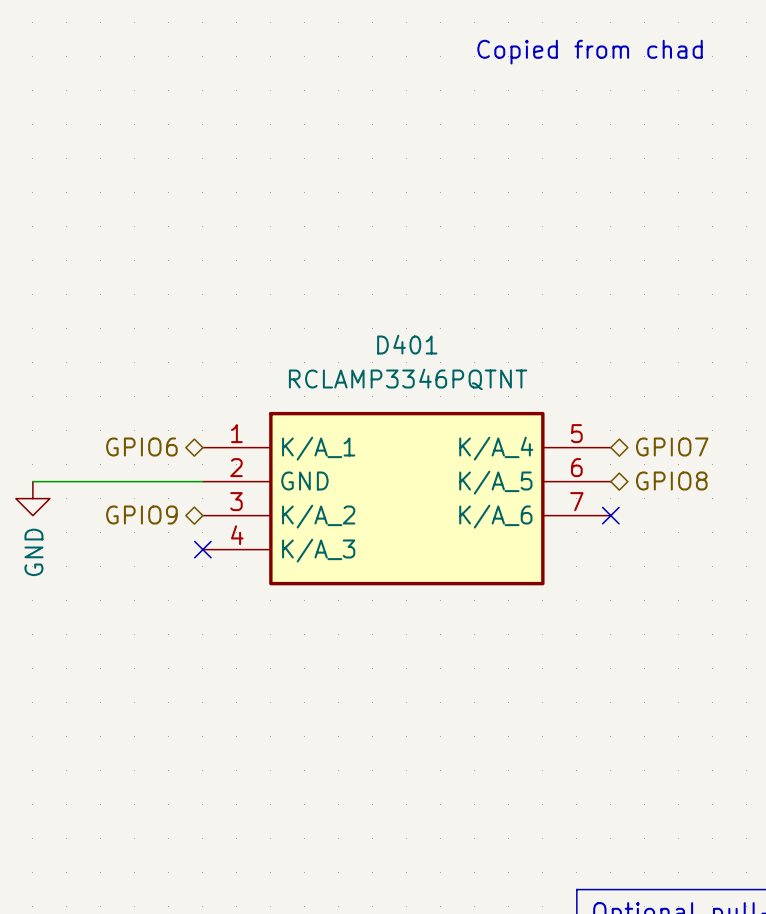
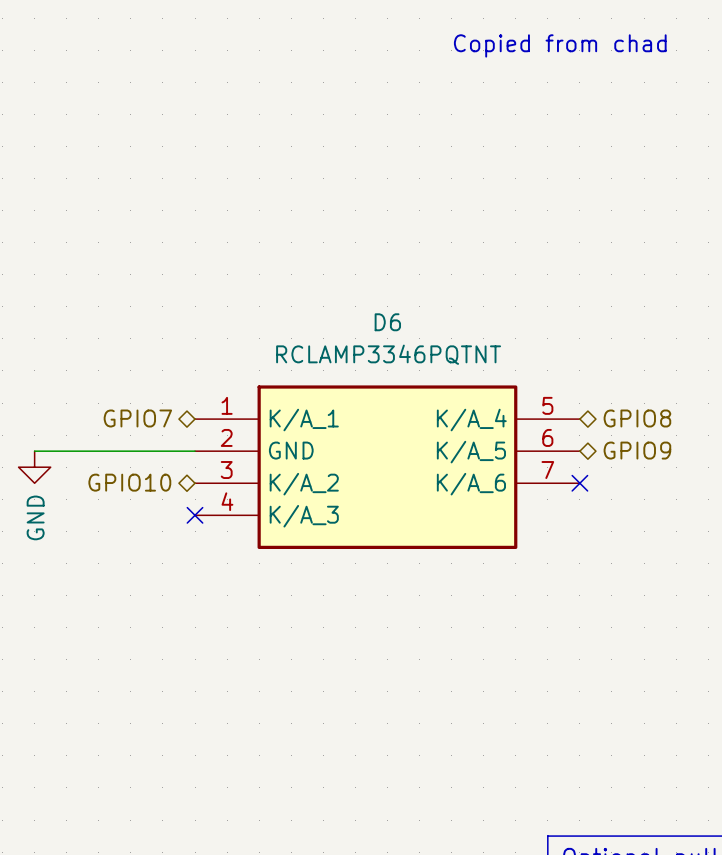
D401 name: D401 (407, 344) -> D6 (387, 322)
hierarchical label: GPIO6 (141, 447) -> GPIO7 (137, 418)
hierarchical label: GPIO7 (672, 447) -> GPIO8 (637, 418)
hierarchical label: GPIO8 (671, 480) -> GPIO9 (637, 450)
hierarchical label: GPIO9 (141, 514) -> GPIO10 (129, 482)

